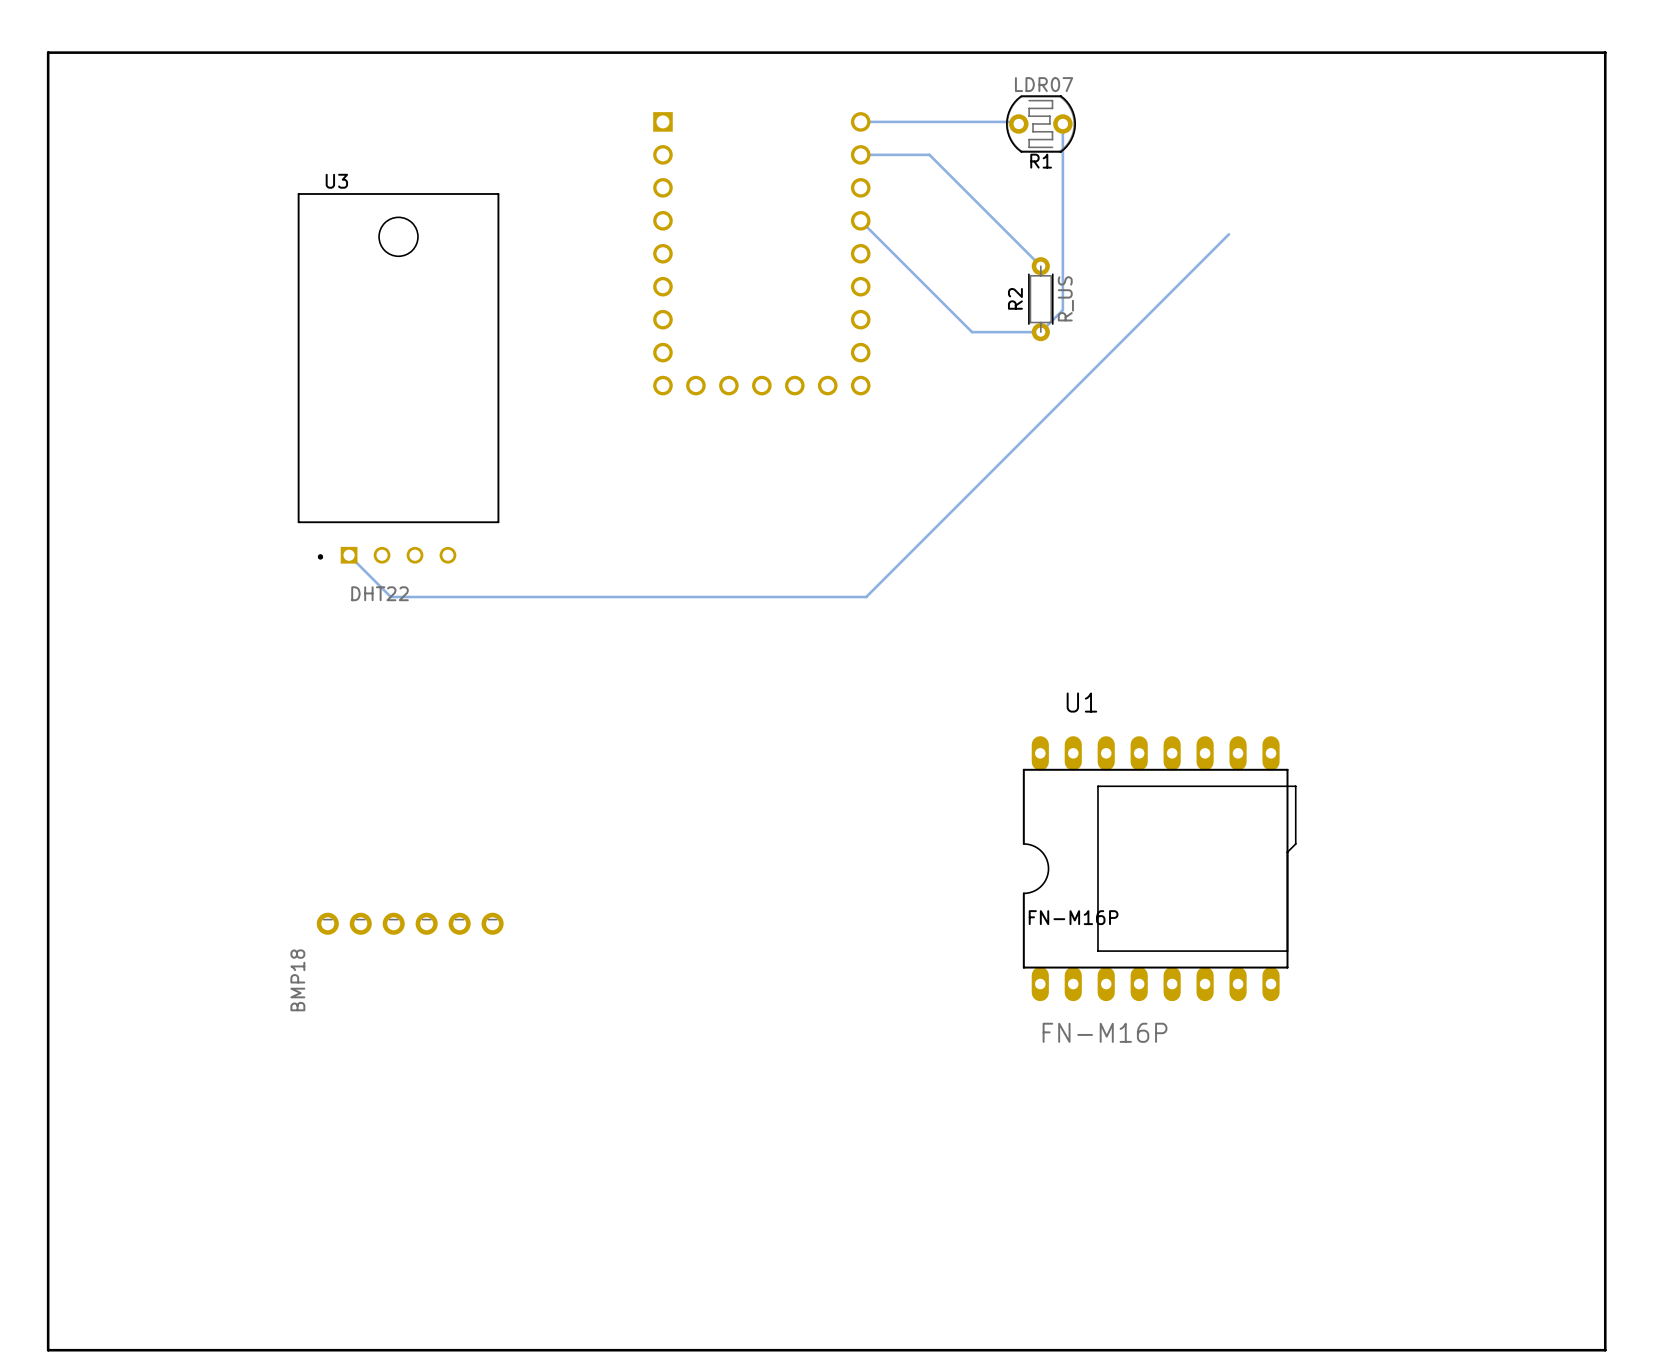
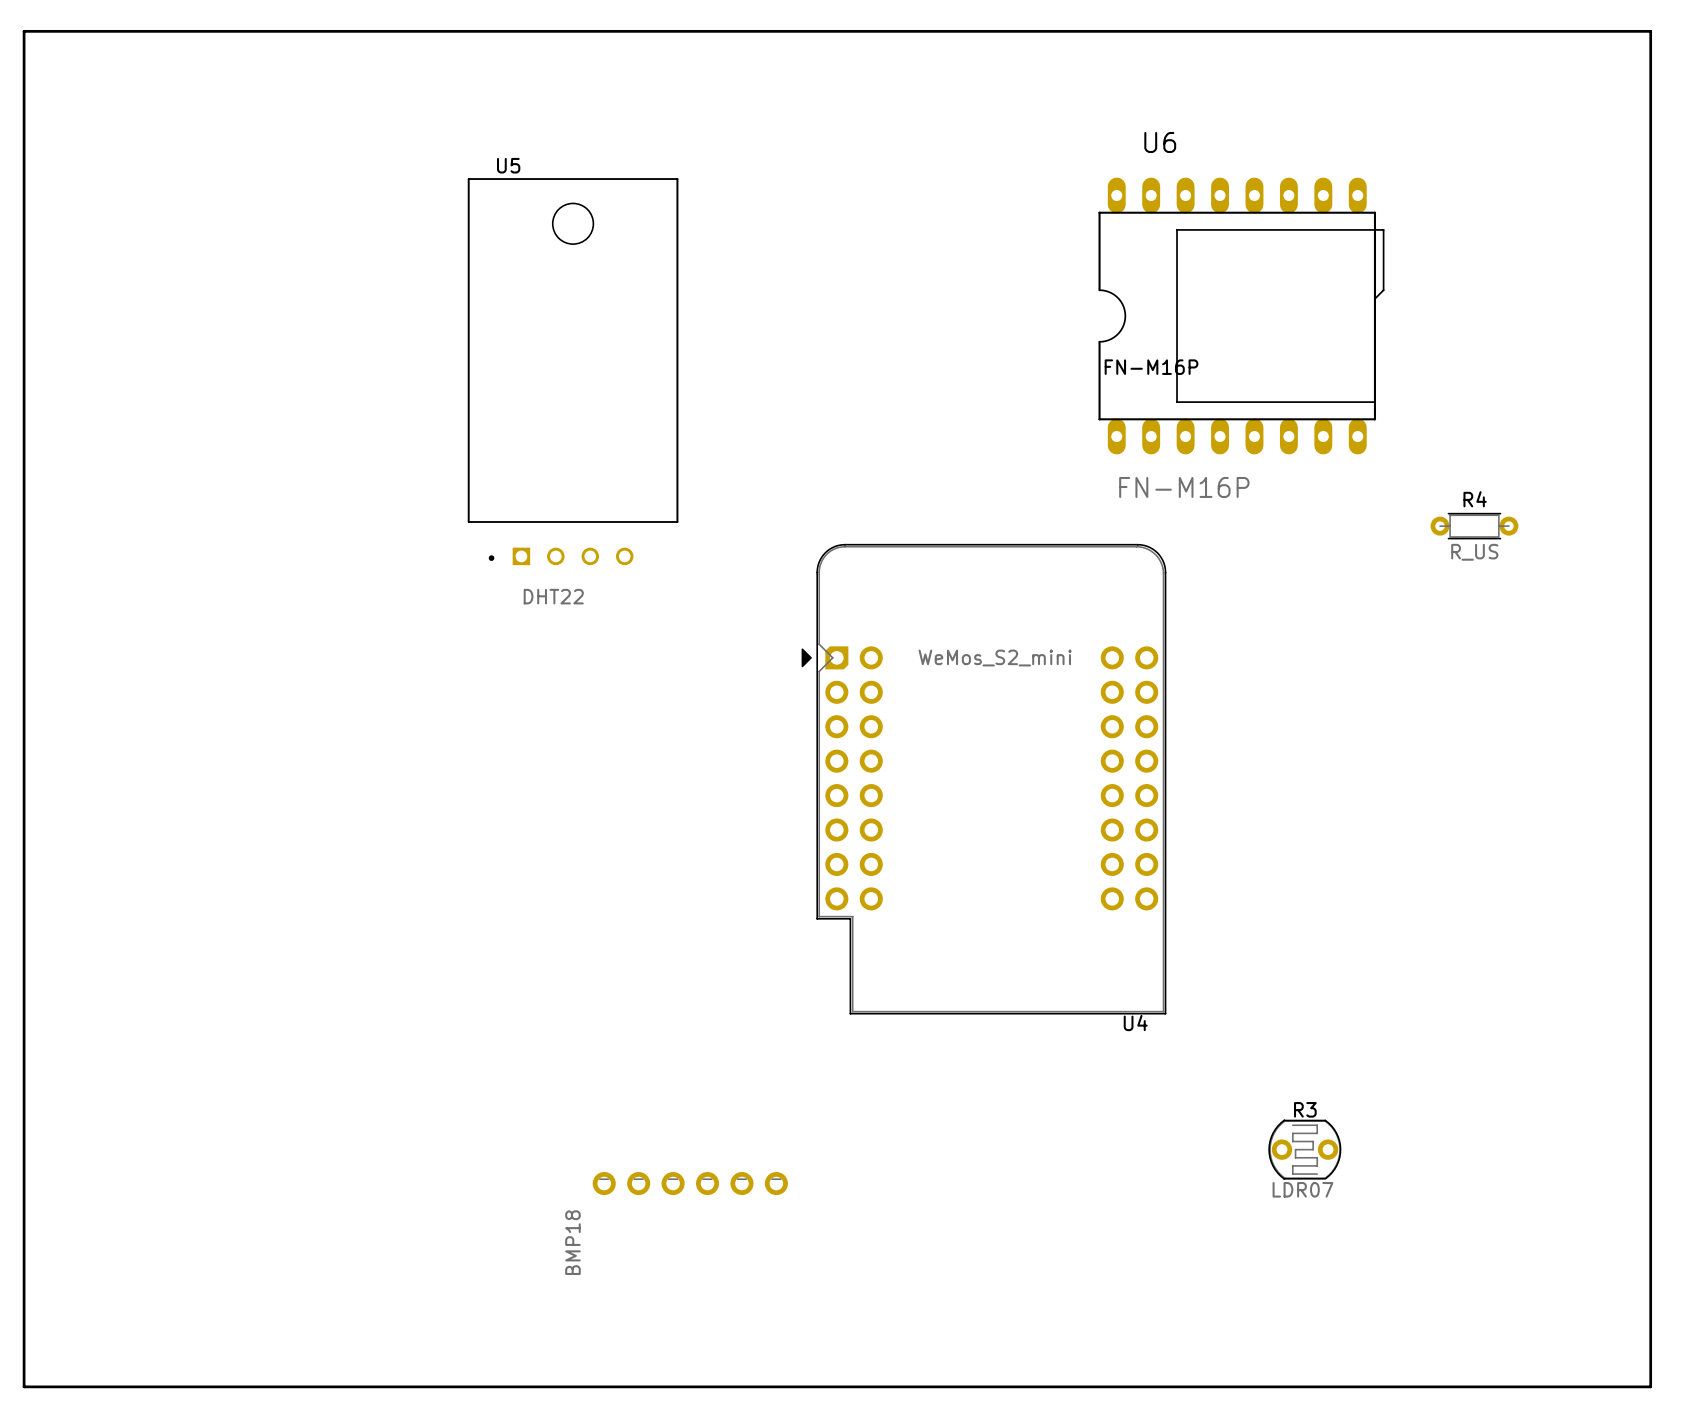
bottom track: (860, 121) (1016, 121) (1018, 123) -> none
bottom track: (1062, 123) (1062, 310) (1040, 332) (972, 332) (860, 220) -> none
R1: LDR07 (1041, 124) -> none
bottom track: (860, 154) (929, 154) (1040, 266) -> none
bottom track: (1228, 234) (866, 597) (390, 597) (349, 555) -> none
part: (761, 253) -> none
R2: R_US (1040, 299) -> none
U6: none -> FN-M16P (1241, 316)
U3: DHT22 (398, 378) -> none
U5: none -> DHT22 (573, 371)
R4: none -> R_US (1474, 526)
U4: none -> WeMos_S2_mini (983, 779)
U1: FN-M16P (1159, 868) -> none
part: BMP18 (410, 923) -> none
R3: none -> LDR07 (1304, 1149)
part: none -> BMP18 (690, 1183)

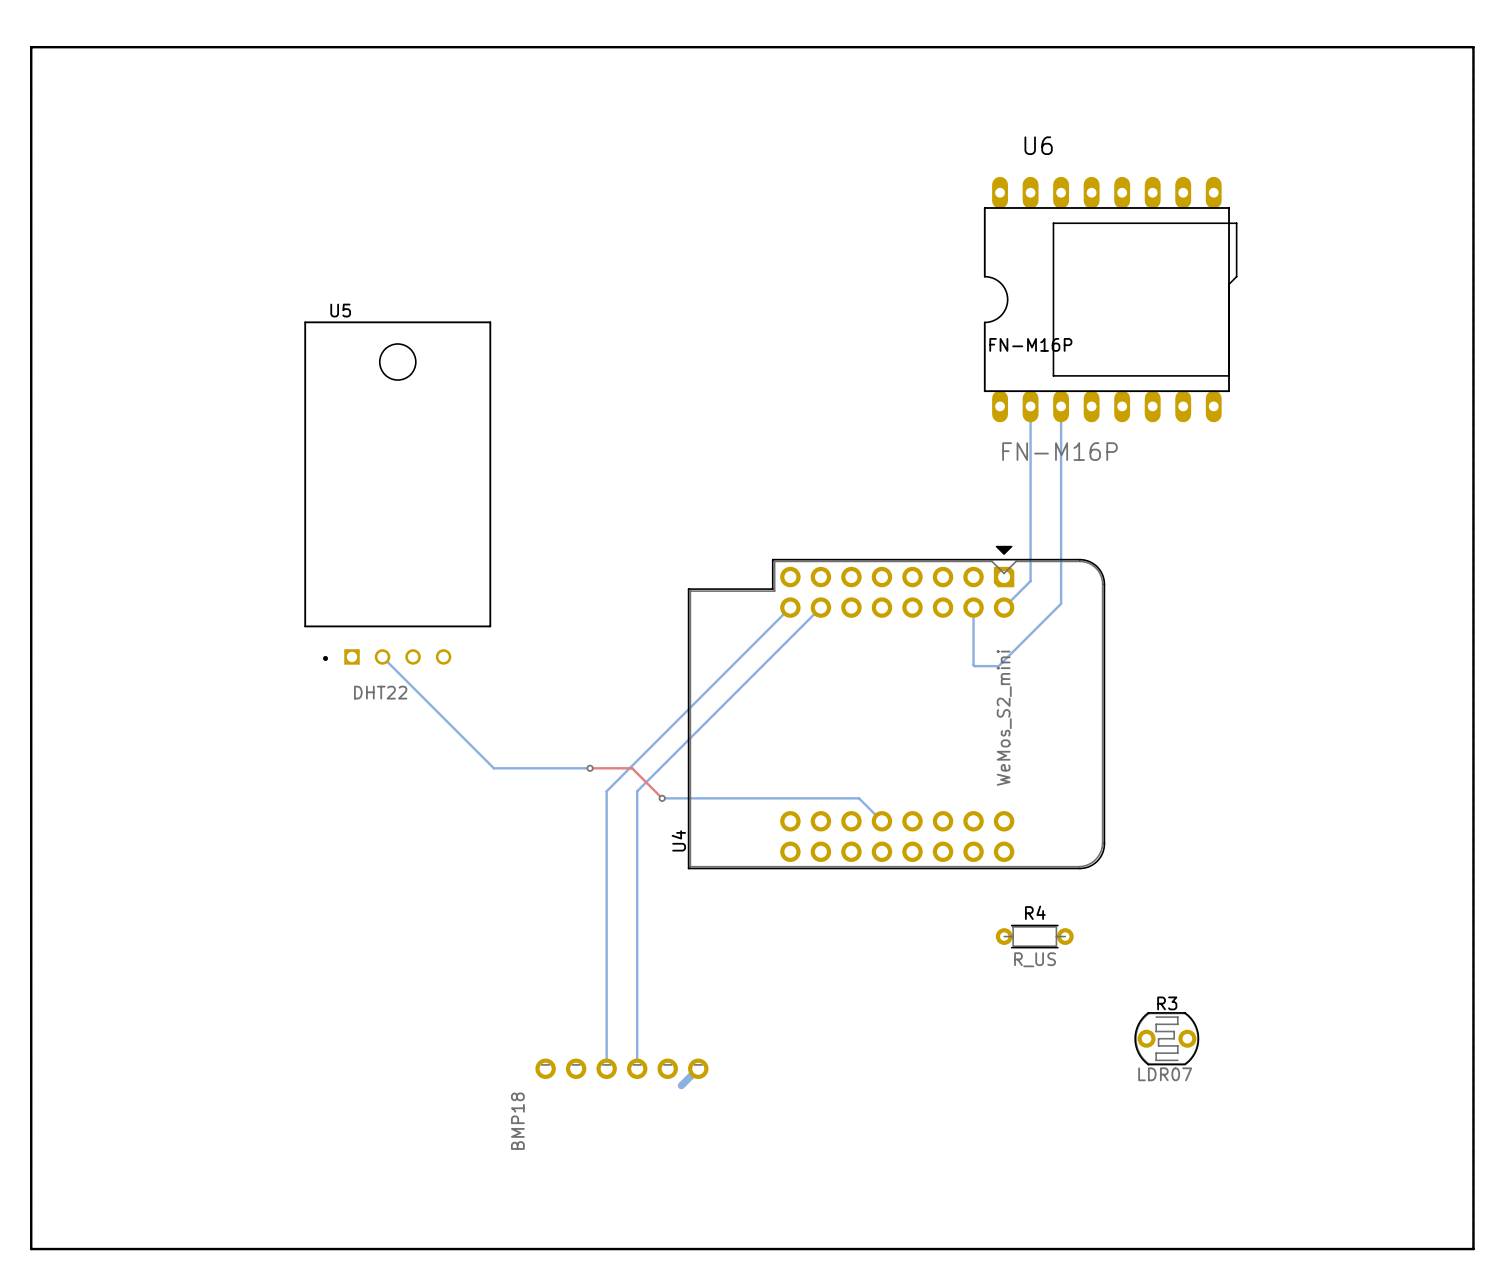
U5 position: (573, 371) -> (397, 493)
bottom track: none -> (1030, 406) (1030, 581) (1004, 607)
bottom track: none -> (1061, 406) (1061, 603) (998, 666) (973, 665) (973, 607)
R4 position: (1474, 526) -> (1034, 936)
bottom track: none -> (790, 607) (606, 791) (606, 1068)
bottom track: none -> (820, 607) (637, 791) (637, 1068)
bottom track: none -> (382, 656) (493, 768) (590, 768)
U4 rotation: 0° (983, 779) -> 90° clockwise (896, 707)
top track: none -> (590, 768) (632, 768) (662, 798)
via: none -> (590, 768)
bottom track: none -> (662, 798) (859, 798) (881, 821)
via: none -> (662, 798)
bottom track: none -> (698, 1068) (681, 1085)

